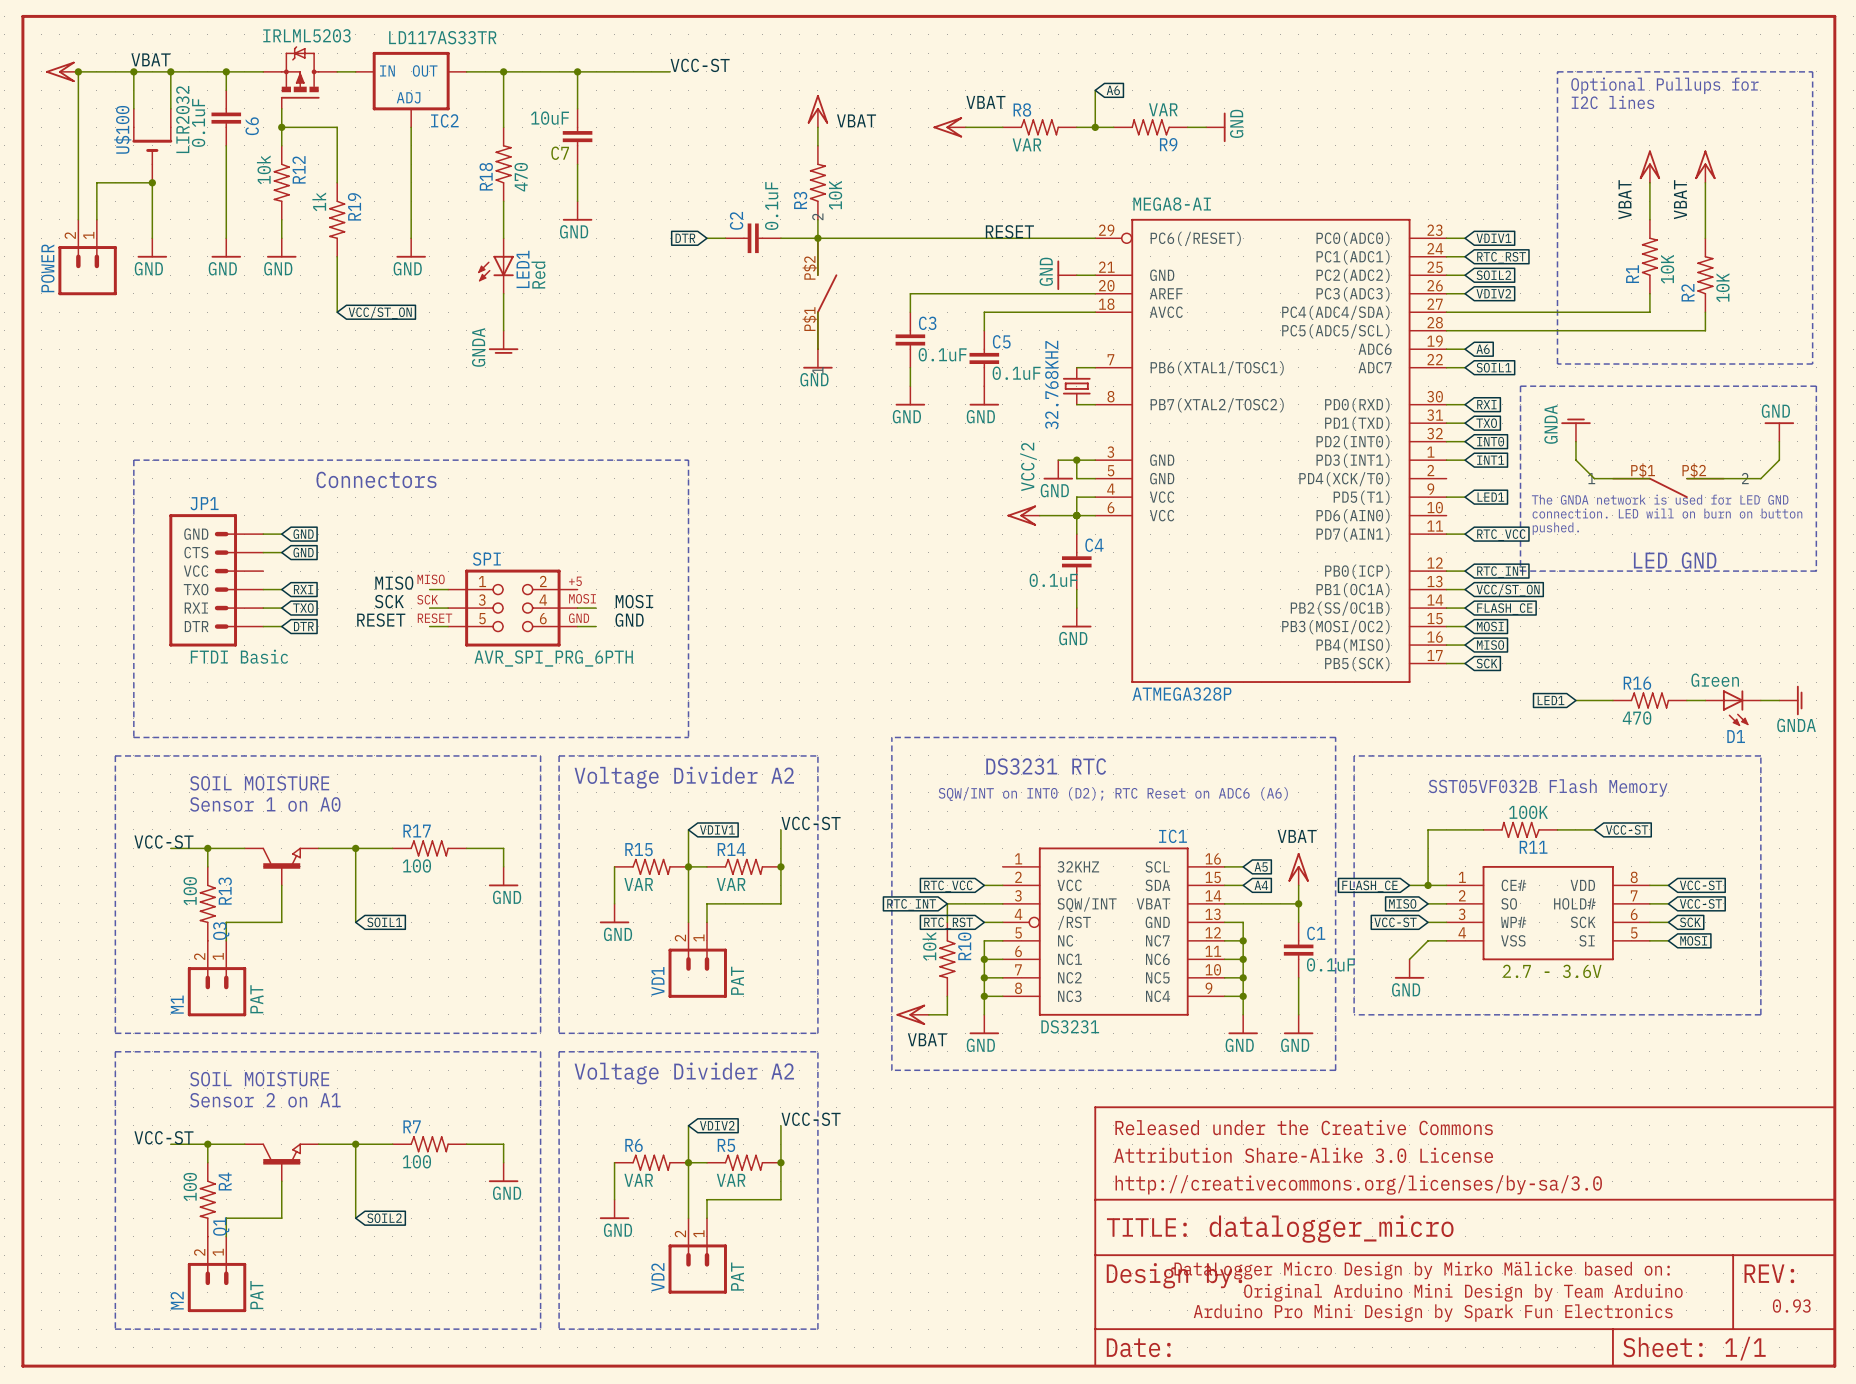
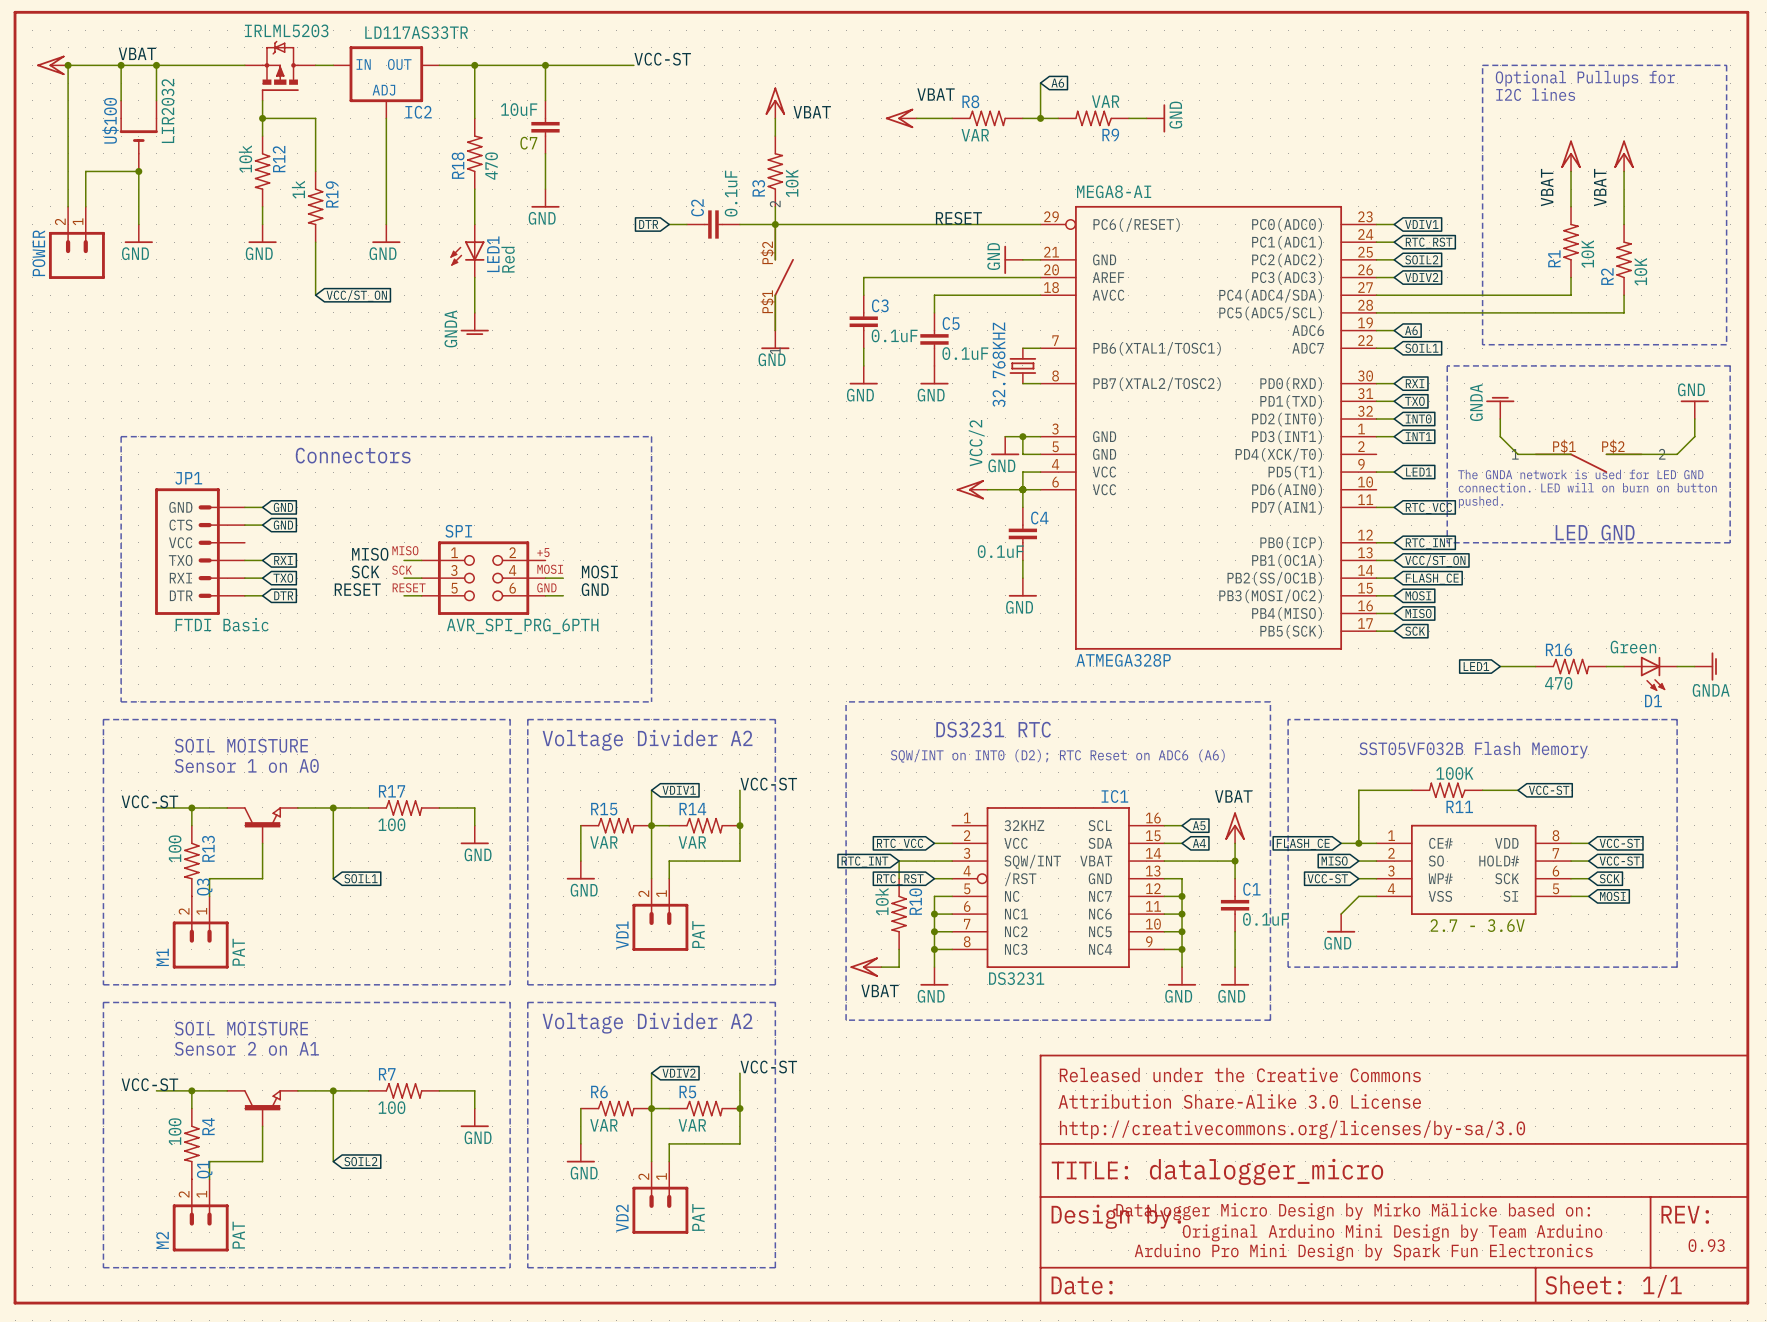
wire: (226, 71) (226, 90) -> none
junction: (226, 71) -> none
C6: 0.1uF (226, 118) -> none
wire: (226, 145) (226, 238) -> none
power symbol: GND (226, 247) -> none

